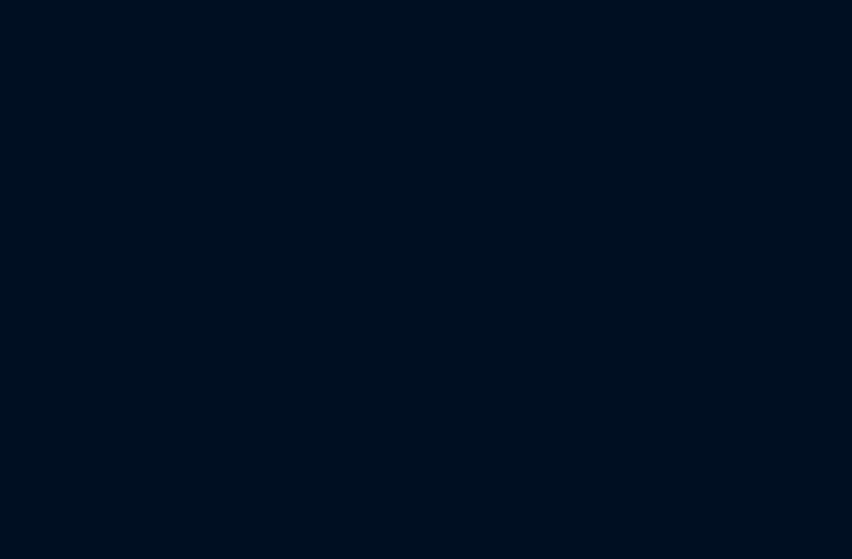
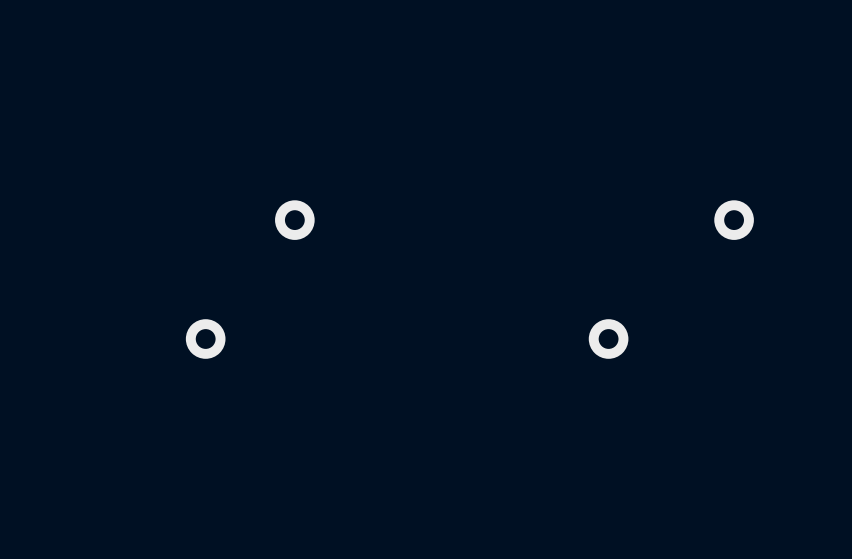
via: none -> (294, 220)
via: none -> (734, 220)
via: none -> (205, 339)
via: none -> (608, 339)

